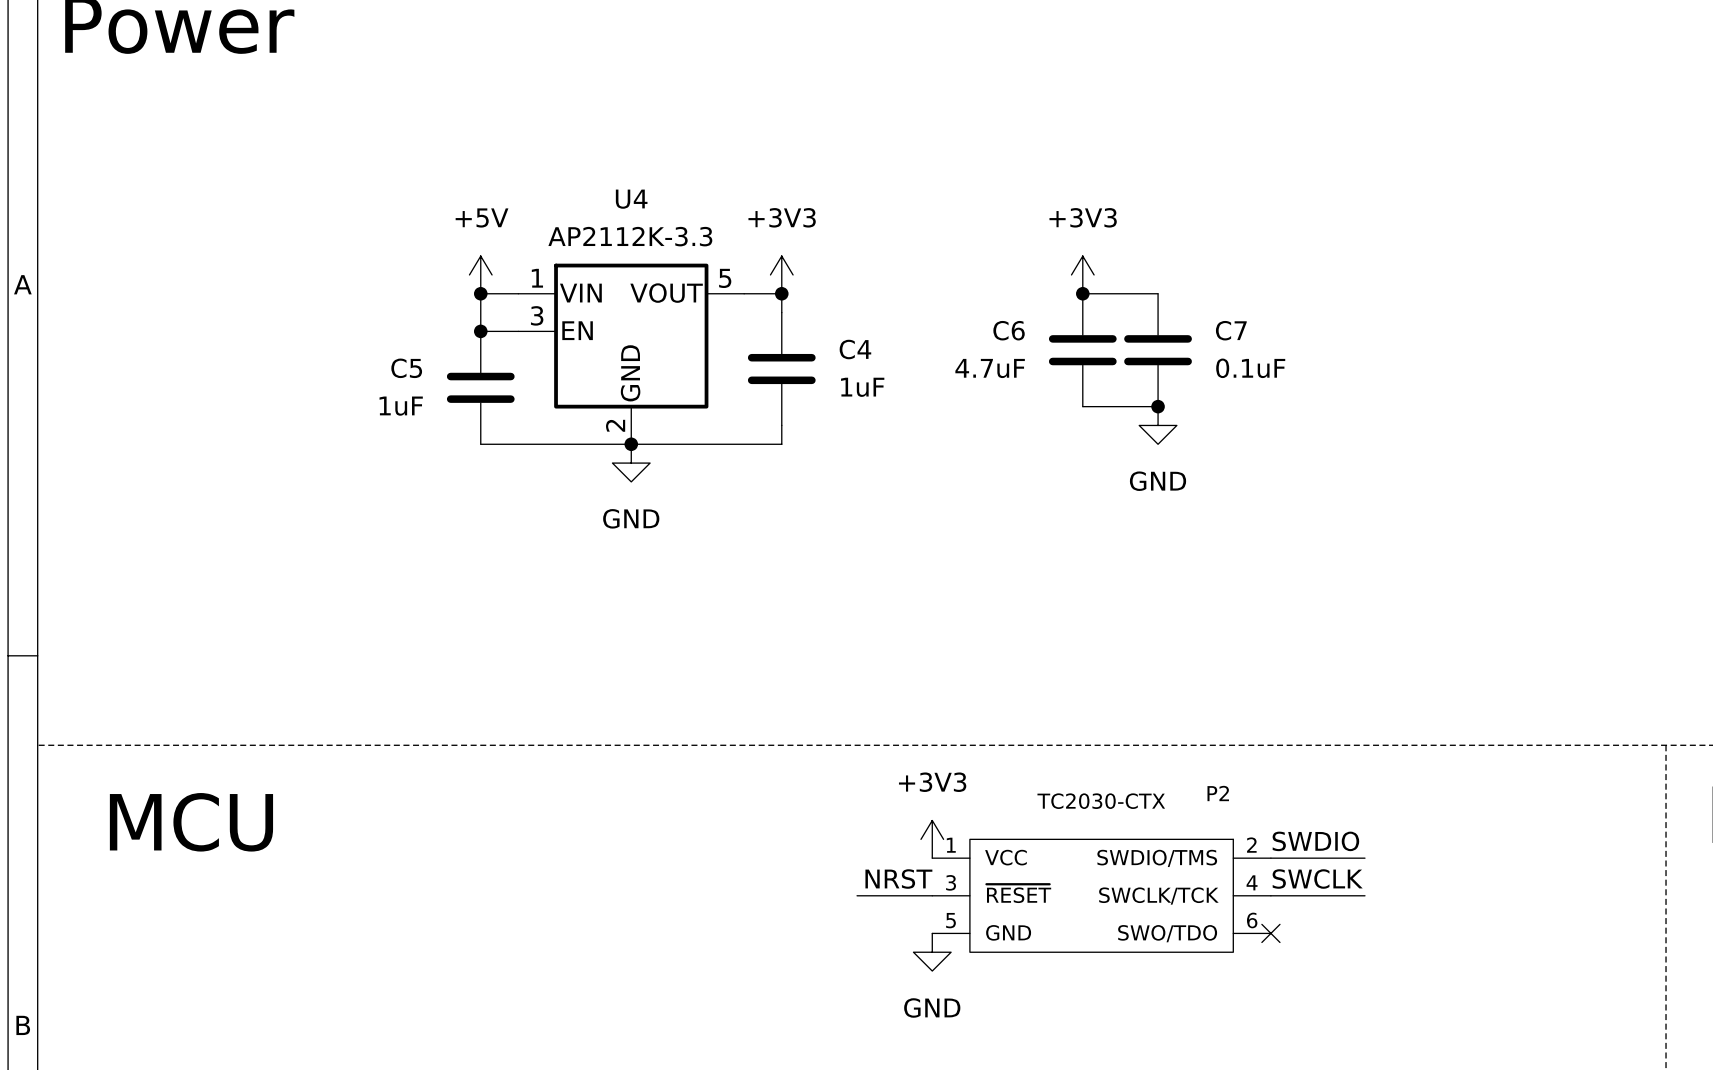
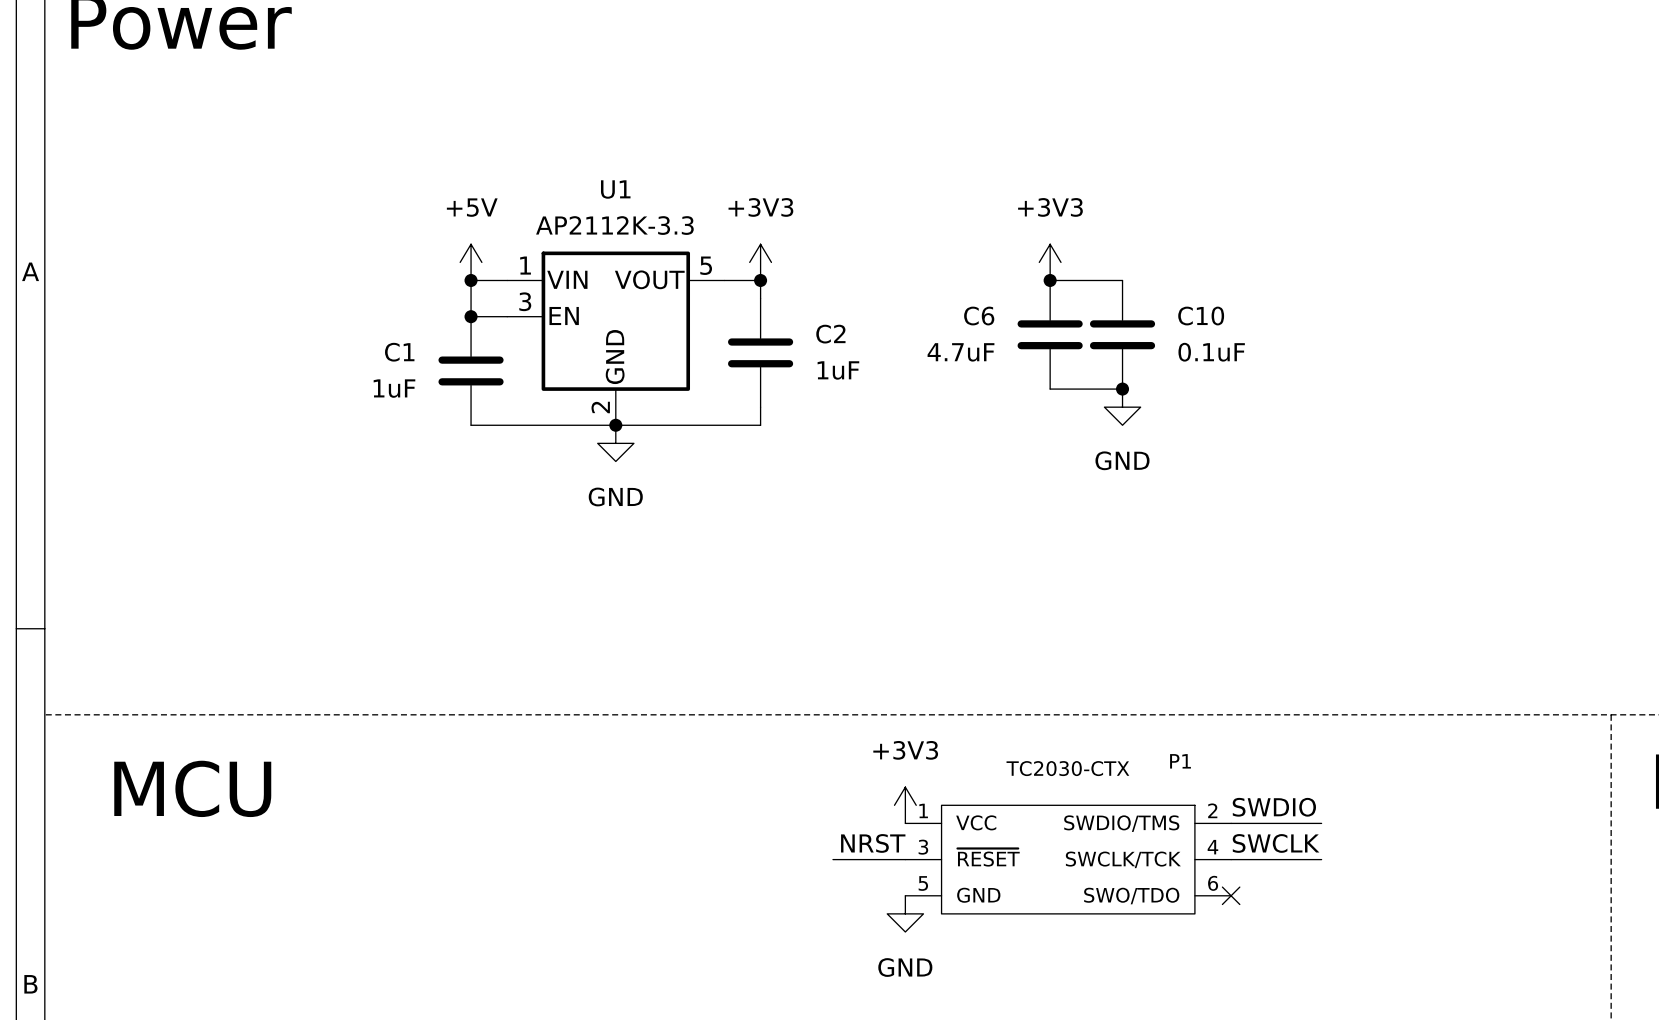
U4 name: U4 (631, 199) -> U1 (615, 189)
C7 name: C7 (1231, 330) -> C10 (1201, 316)
C4 name: C4 (855, 349) -> C2 (830, 334)
C5 name: C5 (406, 368) -> C1 (399, 352)
P2 name: P2 (1218, 793) -> P1 (1180, 761)

